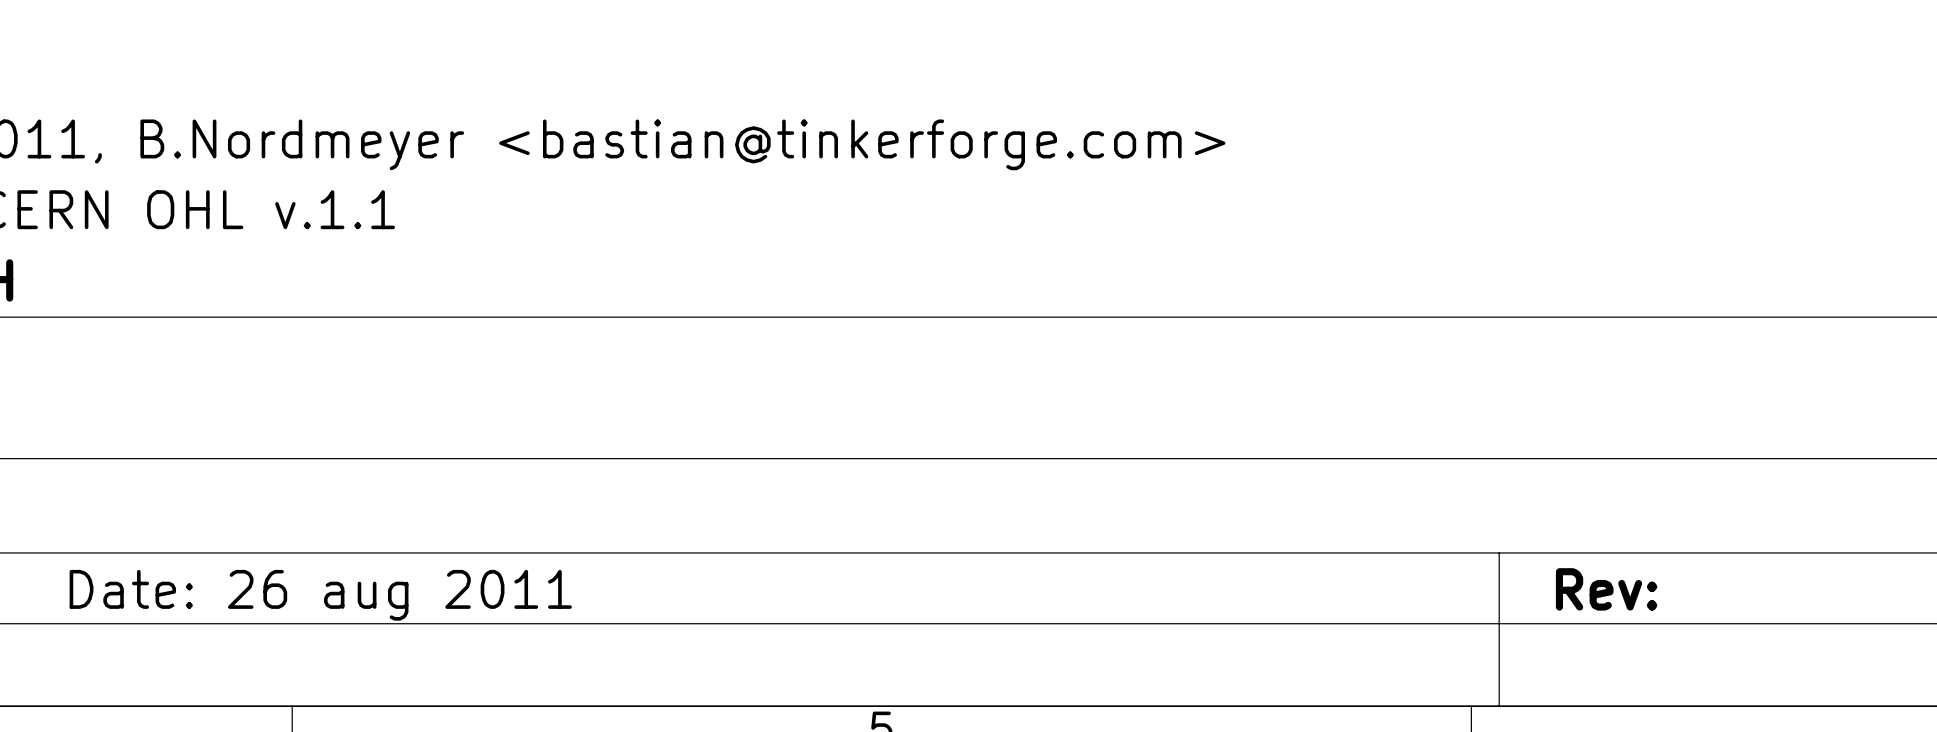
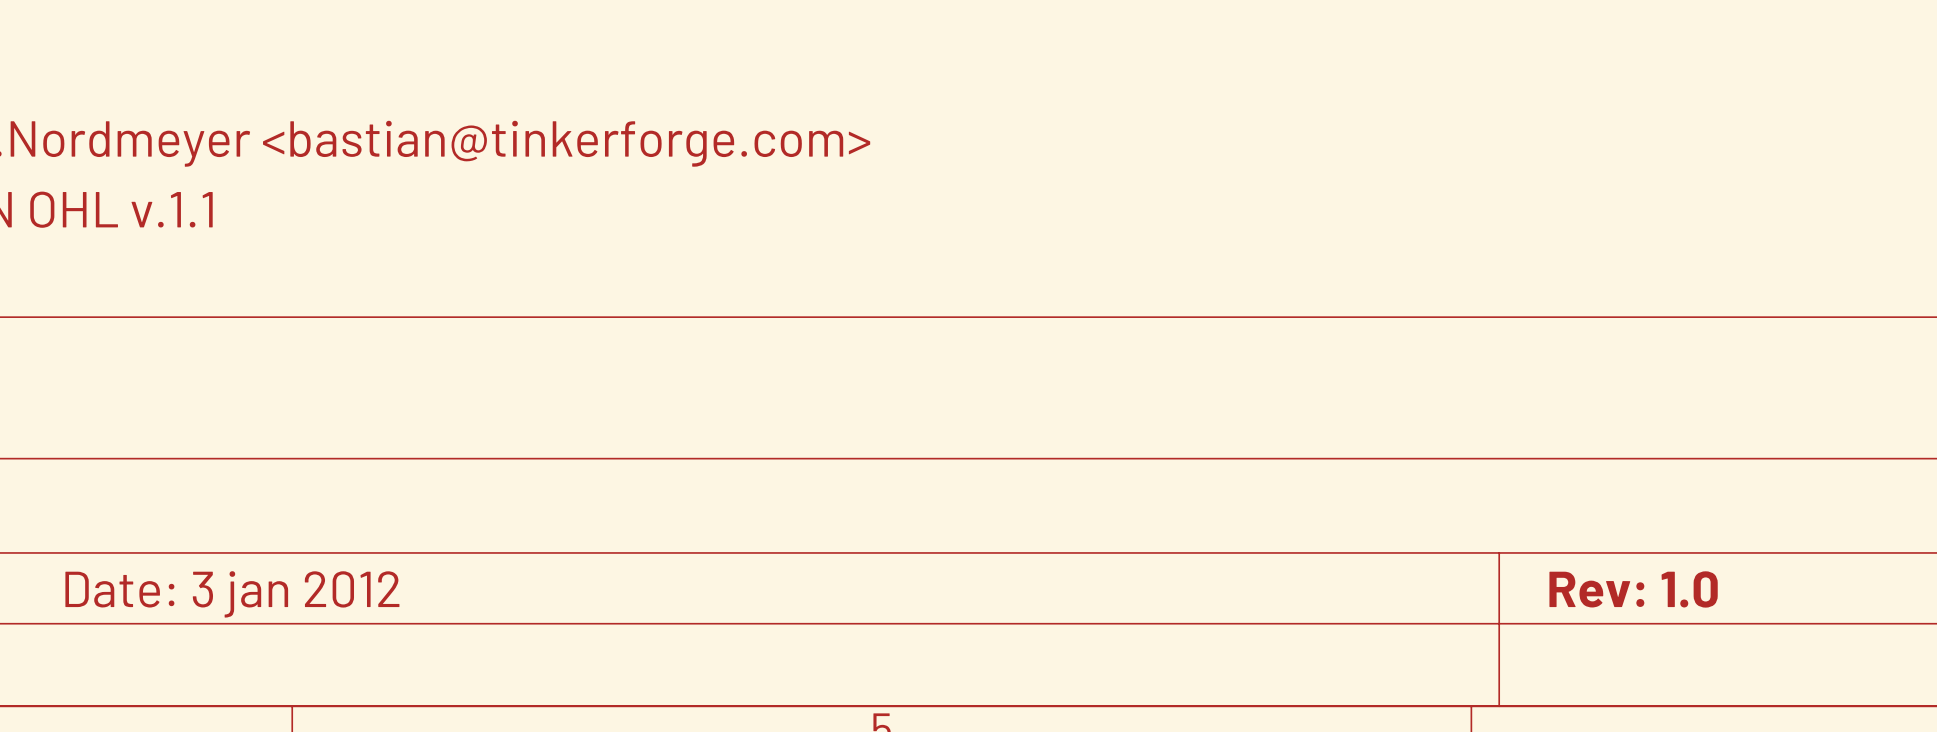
title block: Rev: (1606, 589) -> Rev: 1.0 (1633, 589)
title block: Date: 26 aug 2011 (320, 595) -> Date: 3 jan 2012 (232, 594)

